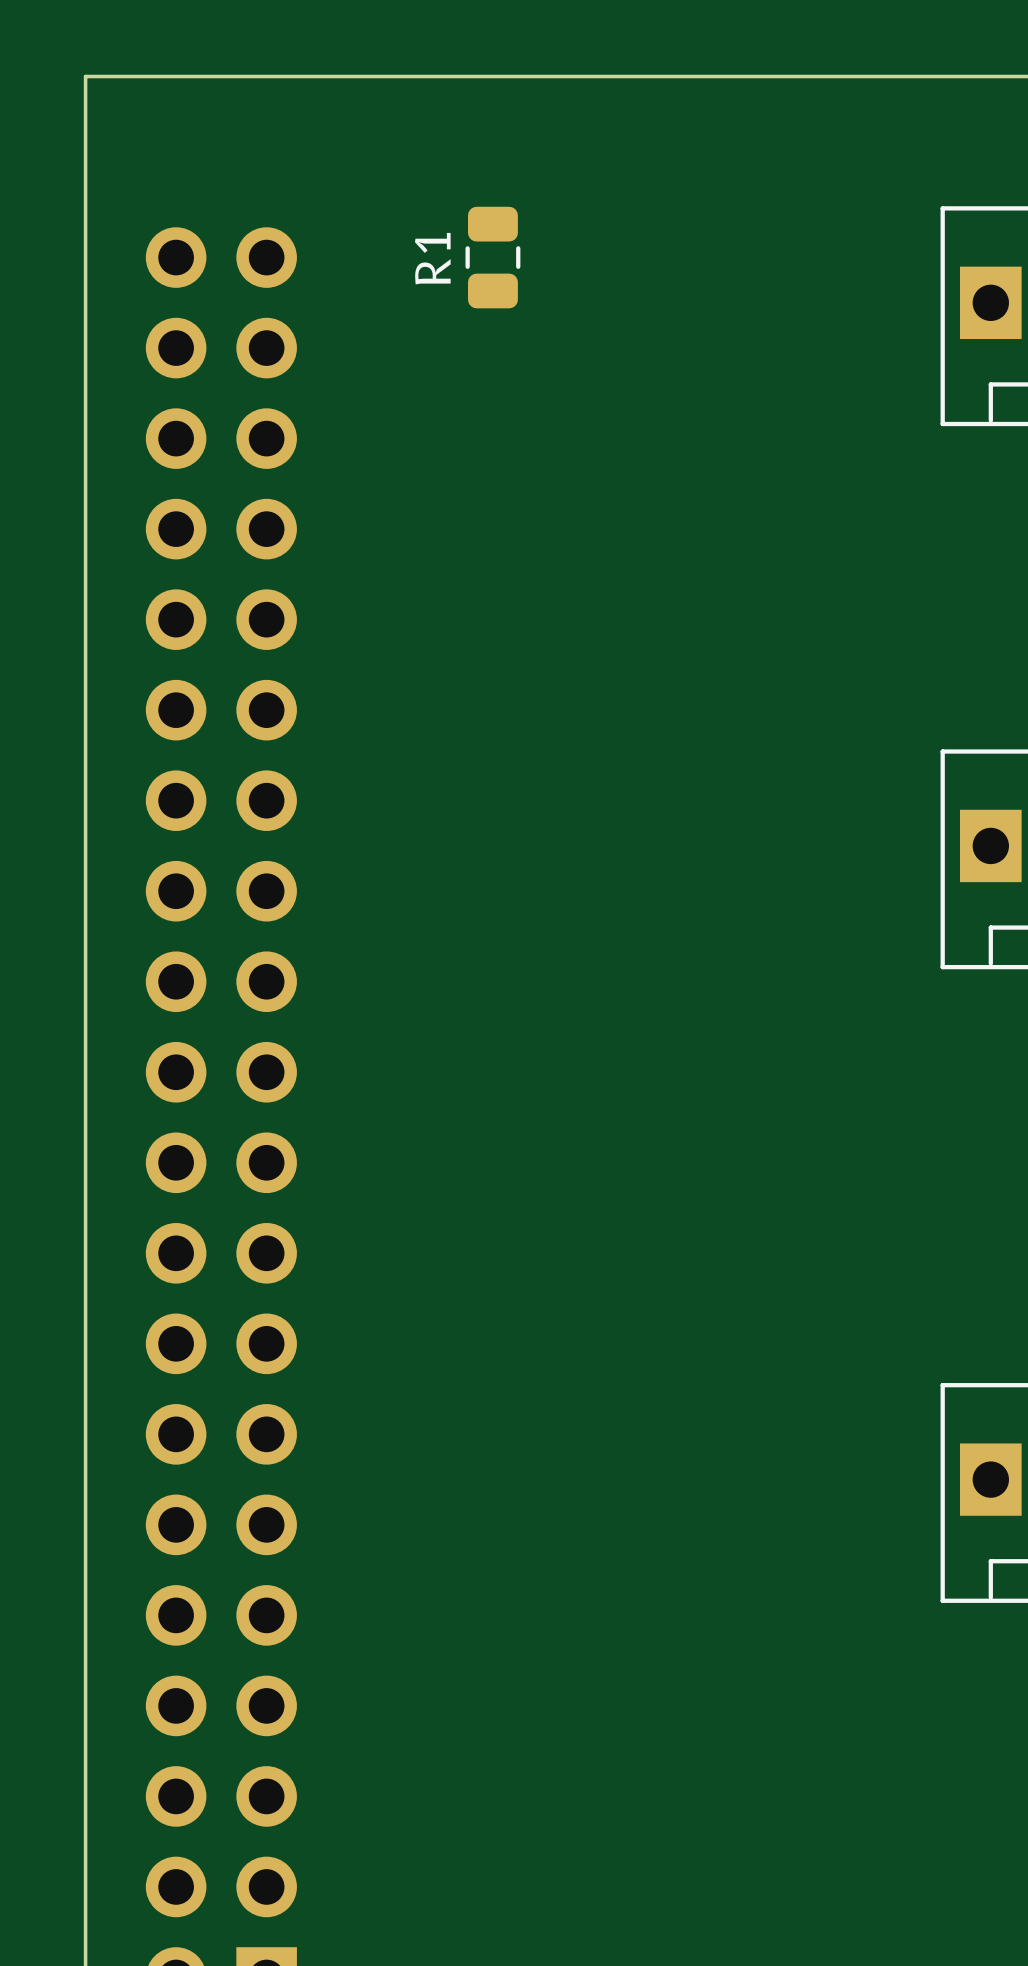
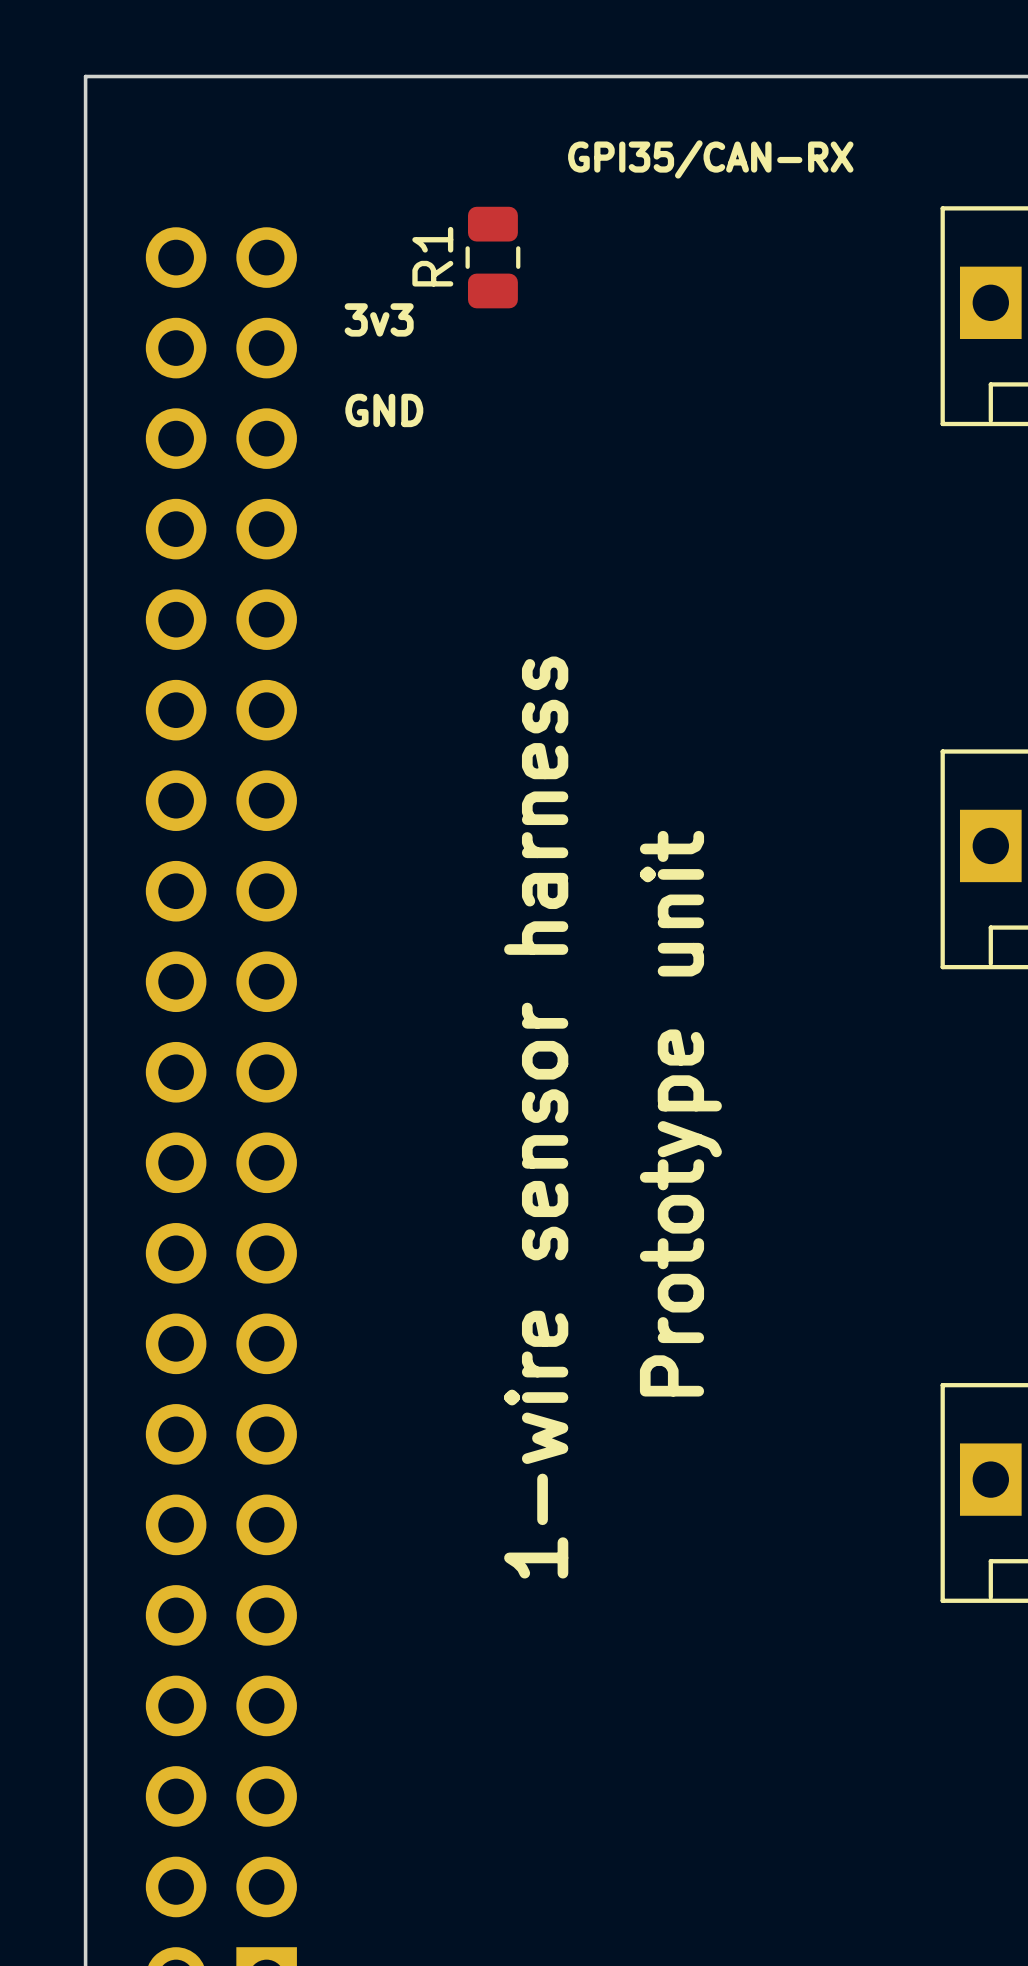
text: none -> GPI35/CAN-RX (710, 159)
text: none -> 3v3 (379, 319)
text: none -> GND (384, 410)
text: none -> 1-wire sensor harness (536, 1117)
text: none -> Prototype unit (680, 1113)

